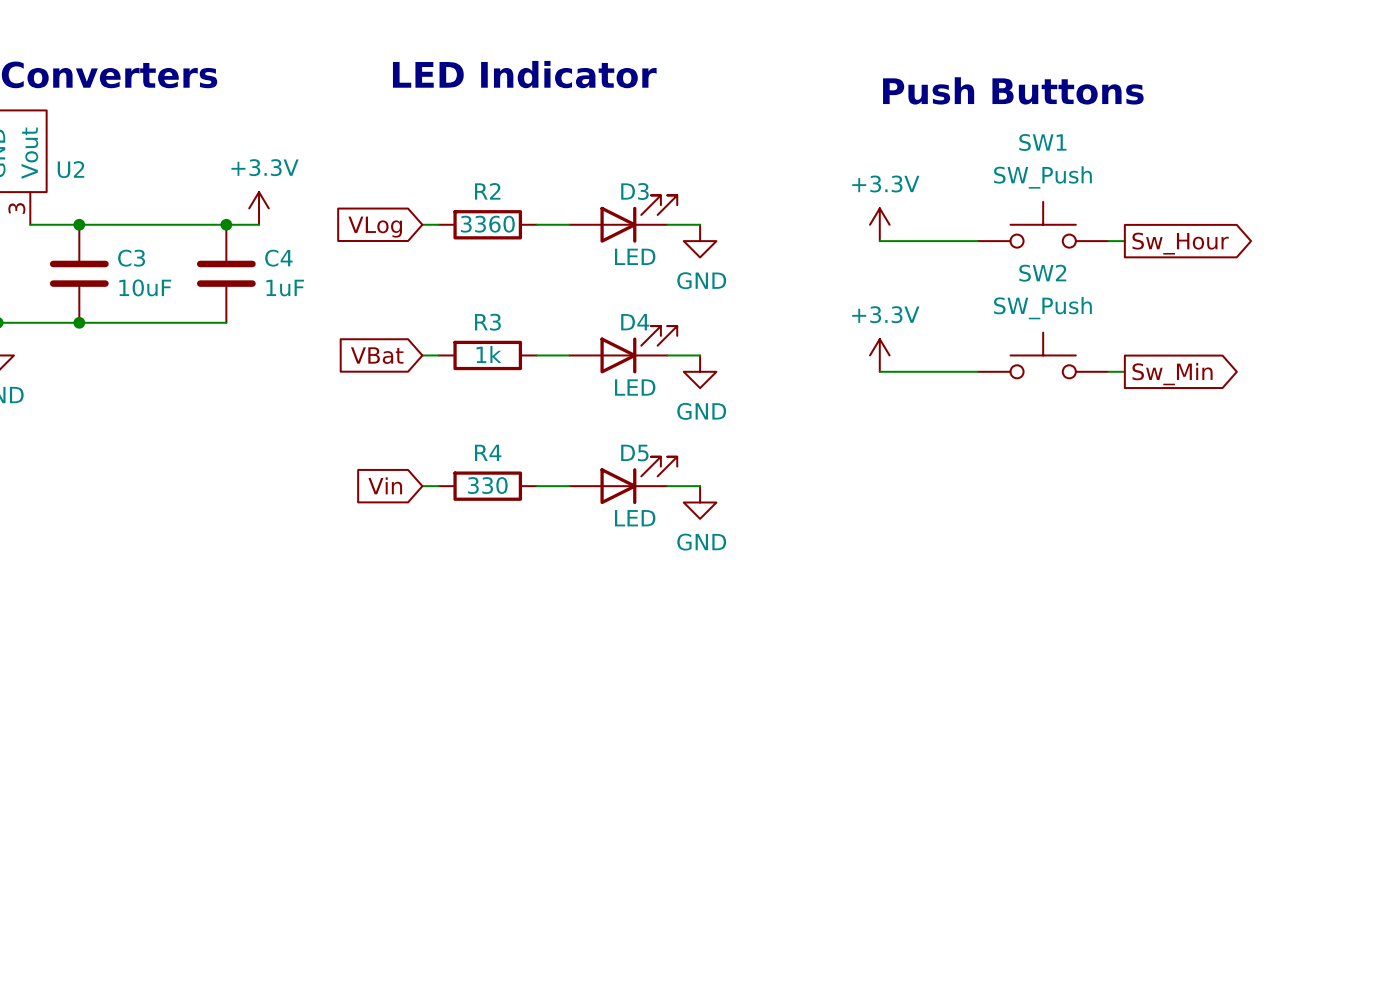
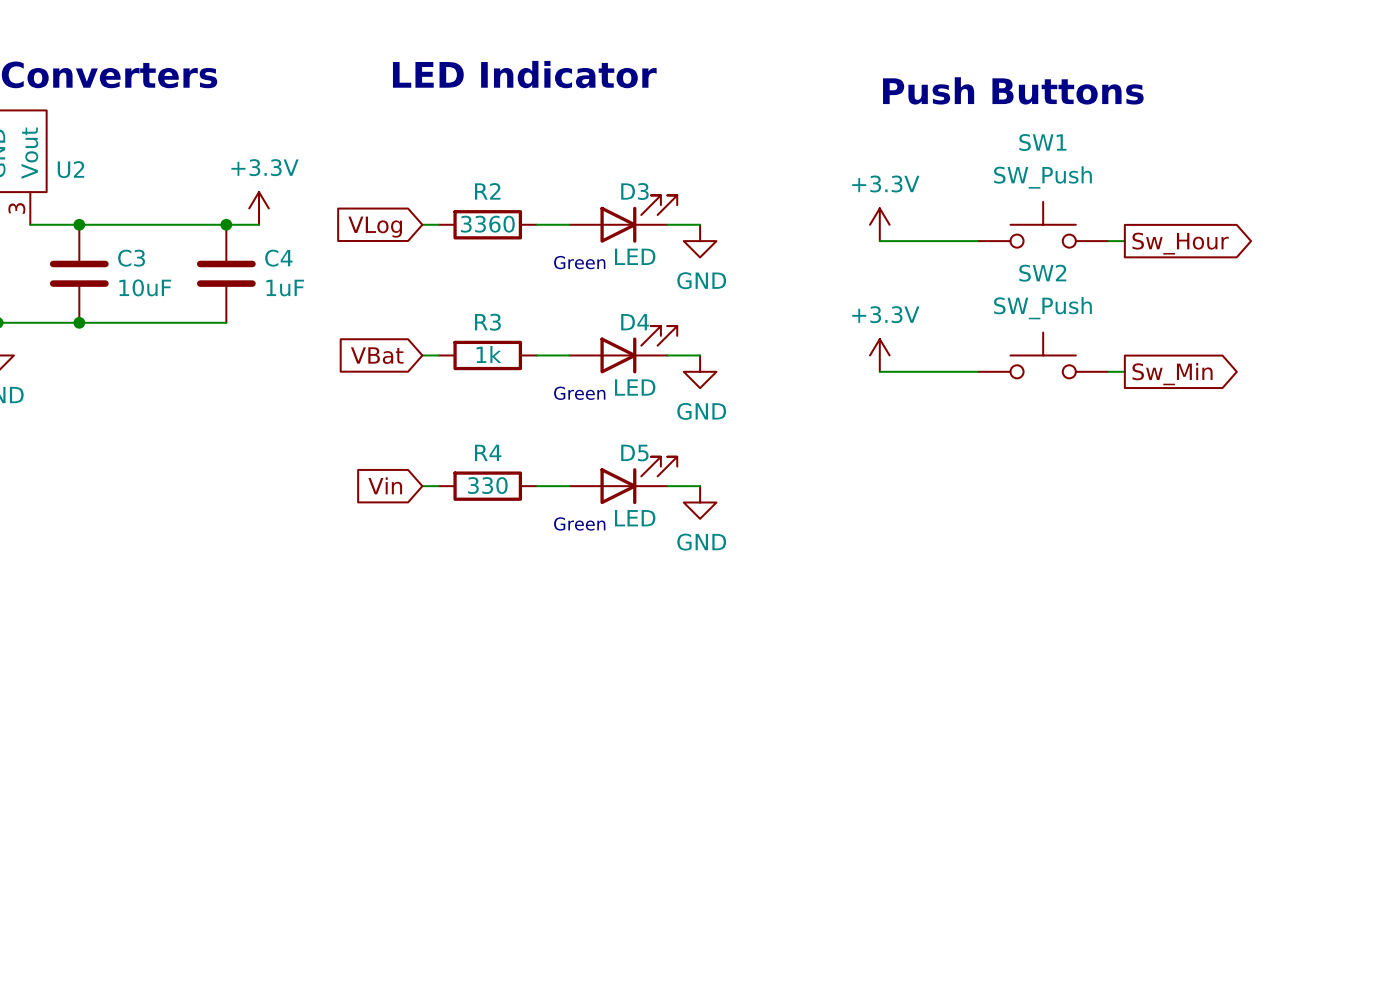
text: none -> Green (579, 262)
text: none -> Green (579, 393)
text: none -> Green (579, 523)

